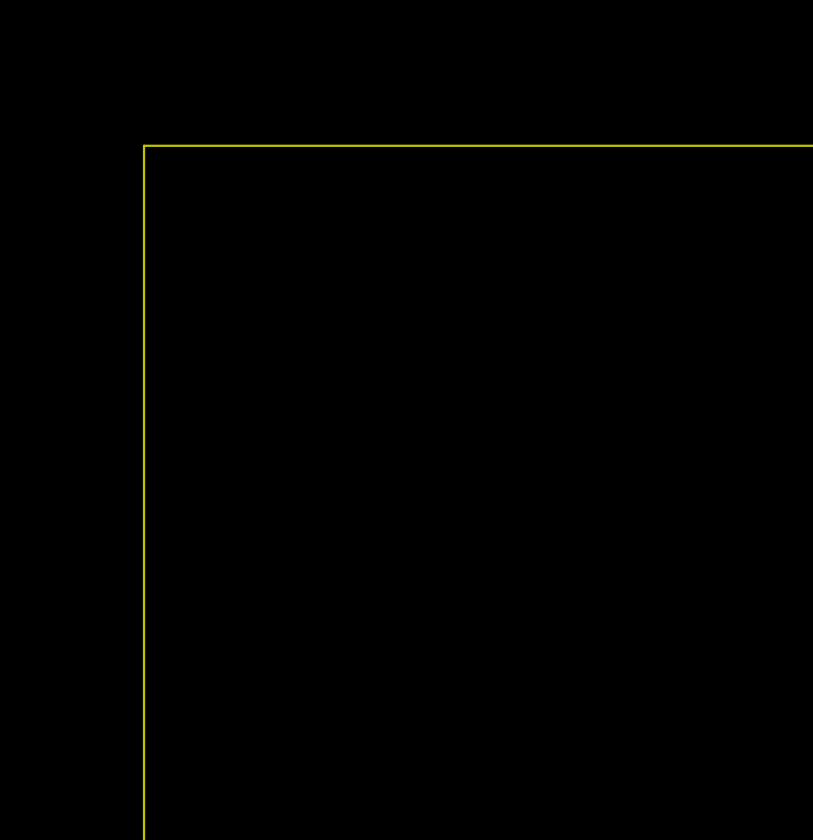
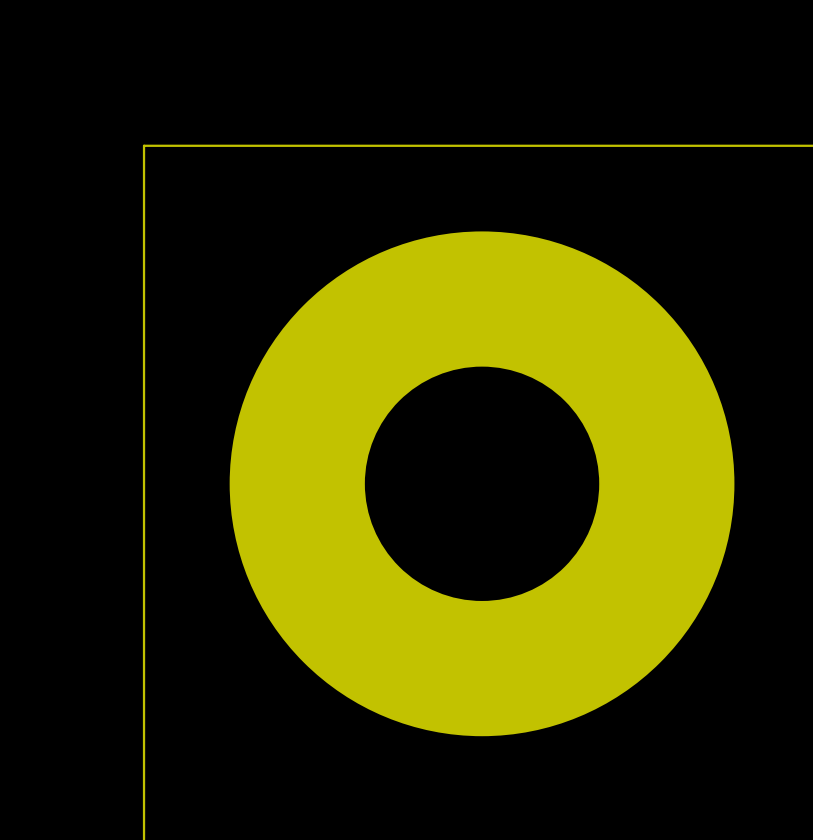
part: none -> (482, 483)

